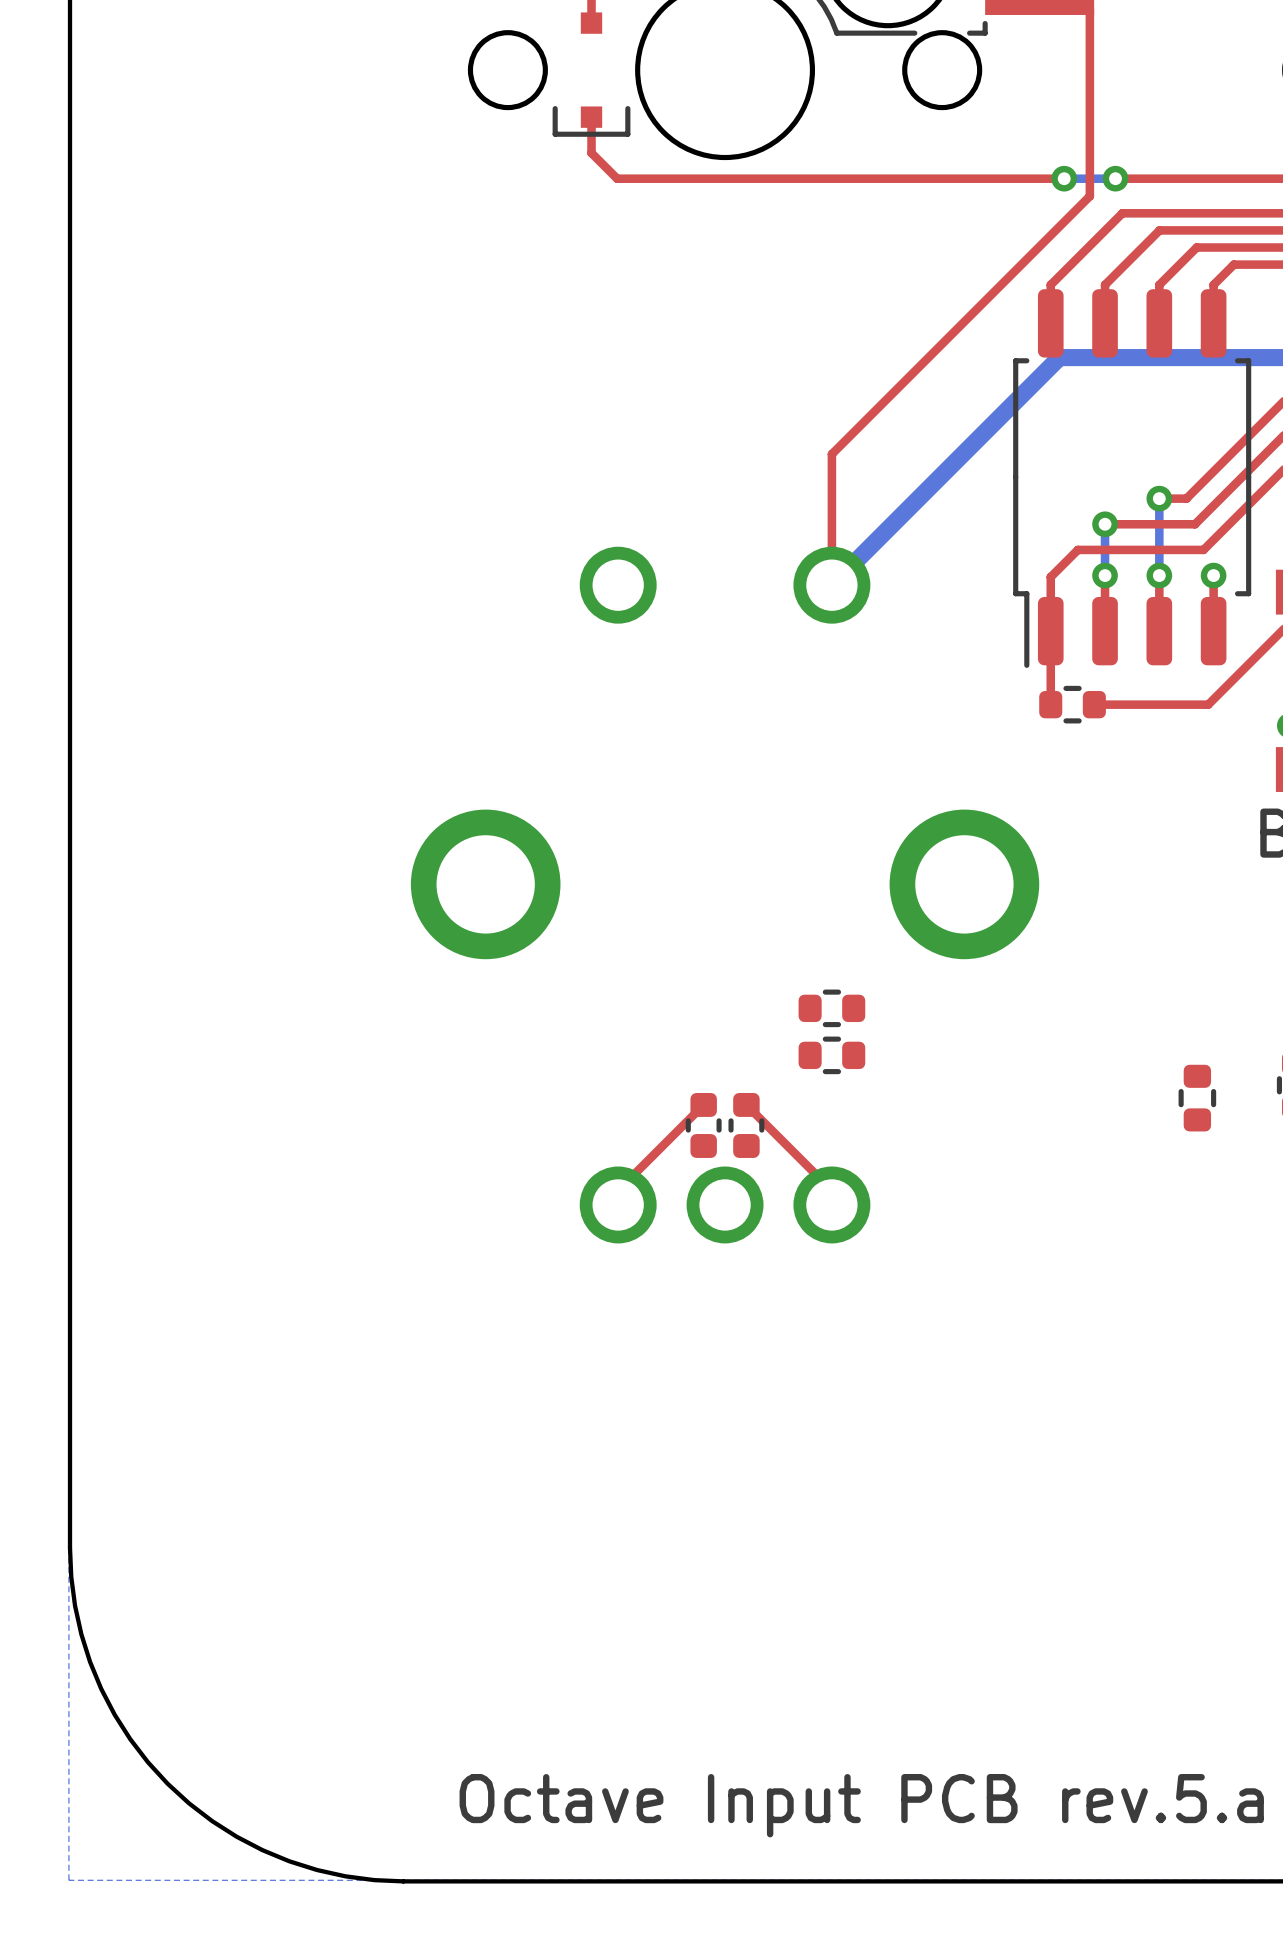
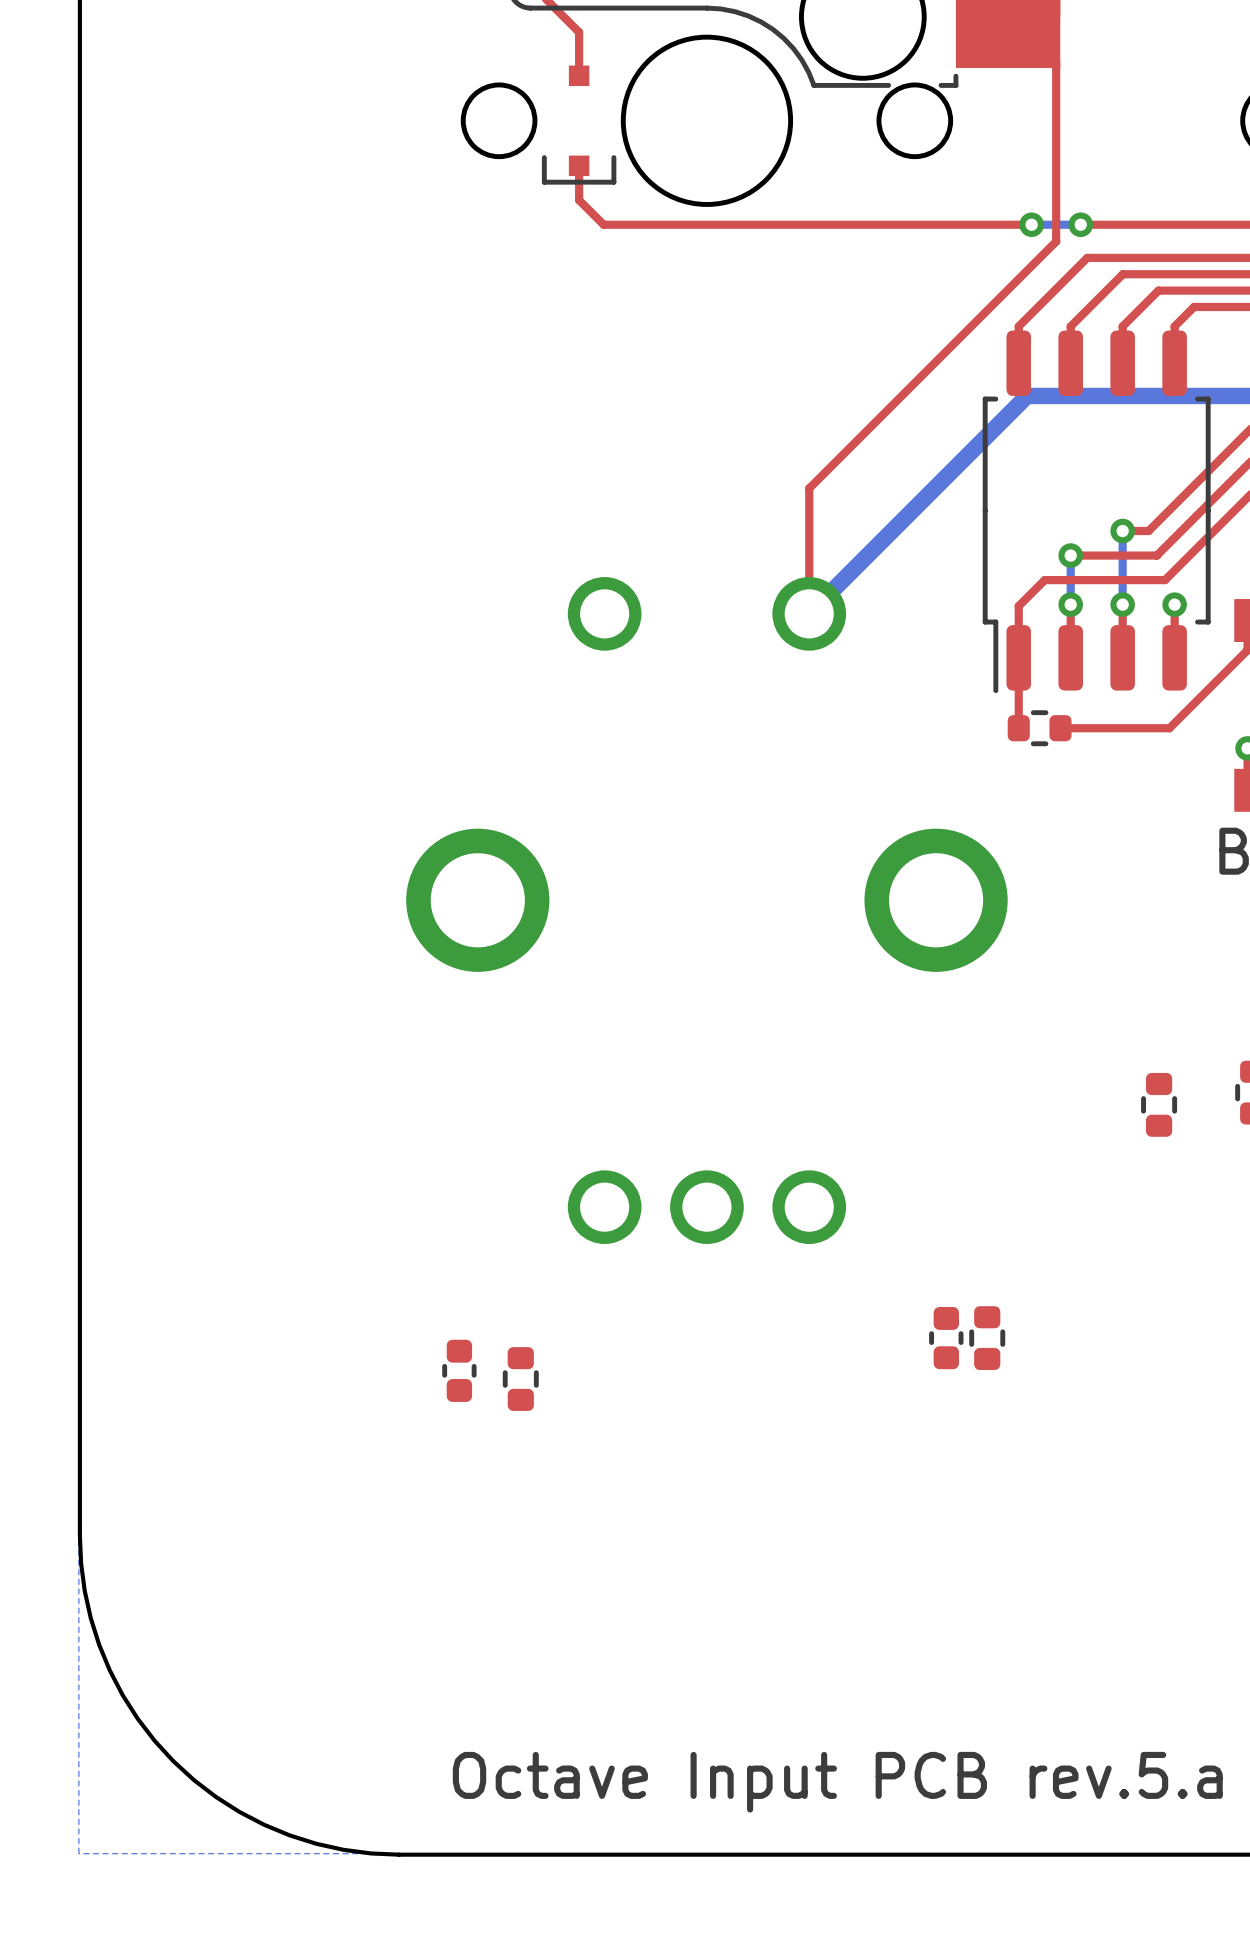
part: (831, 1008) -> none
part: (831, 1055) -> none
top track: (703, 1104) (618, 1190) (618, 1204) -> none
top track: (746, 1104) (831, 1190) (831, 1204) -> none
part: (703, 1125) -> none
part: (746, 1125) -> none
part: none -> (946, 1338)
part: none -> (987, 1338)
part: none -> (459, 1370)
part: none -> (520, 1379)

